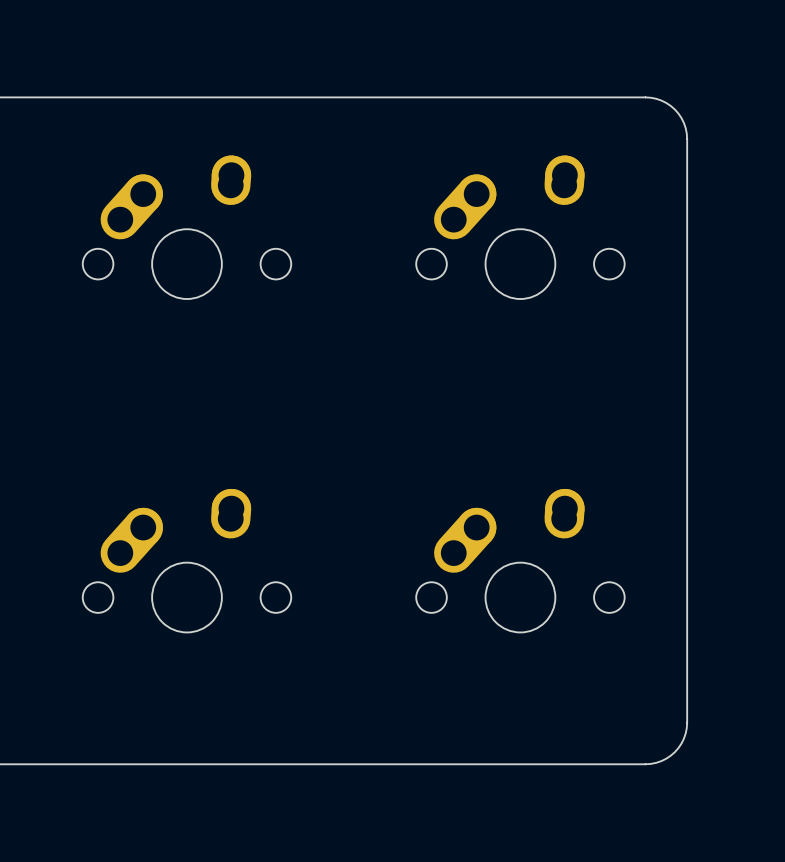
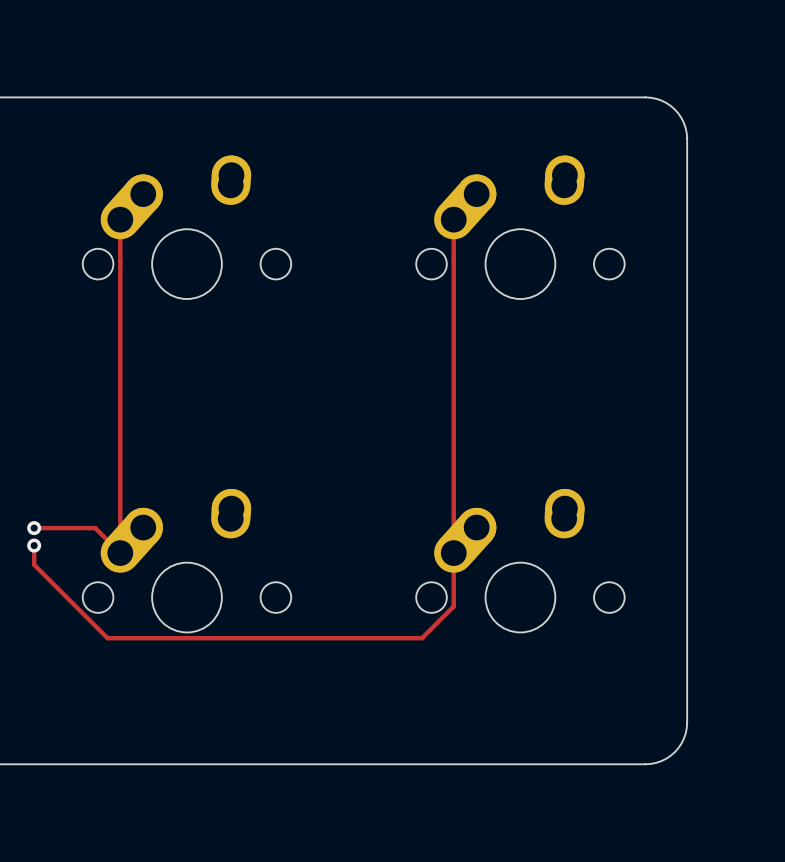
track: none -> (120, 219) (120, 553) (95, 528) (34, 528)
track: none -> (453, 219) (453, 606) (422, 638) (107, 638) (34, 564) (34, 545)
via: none -> (34, 528)
via: none -> (34, 545)

